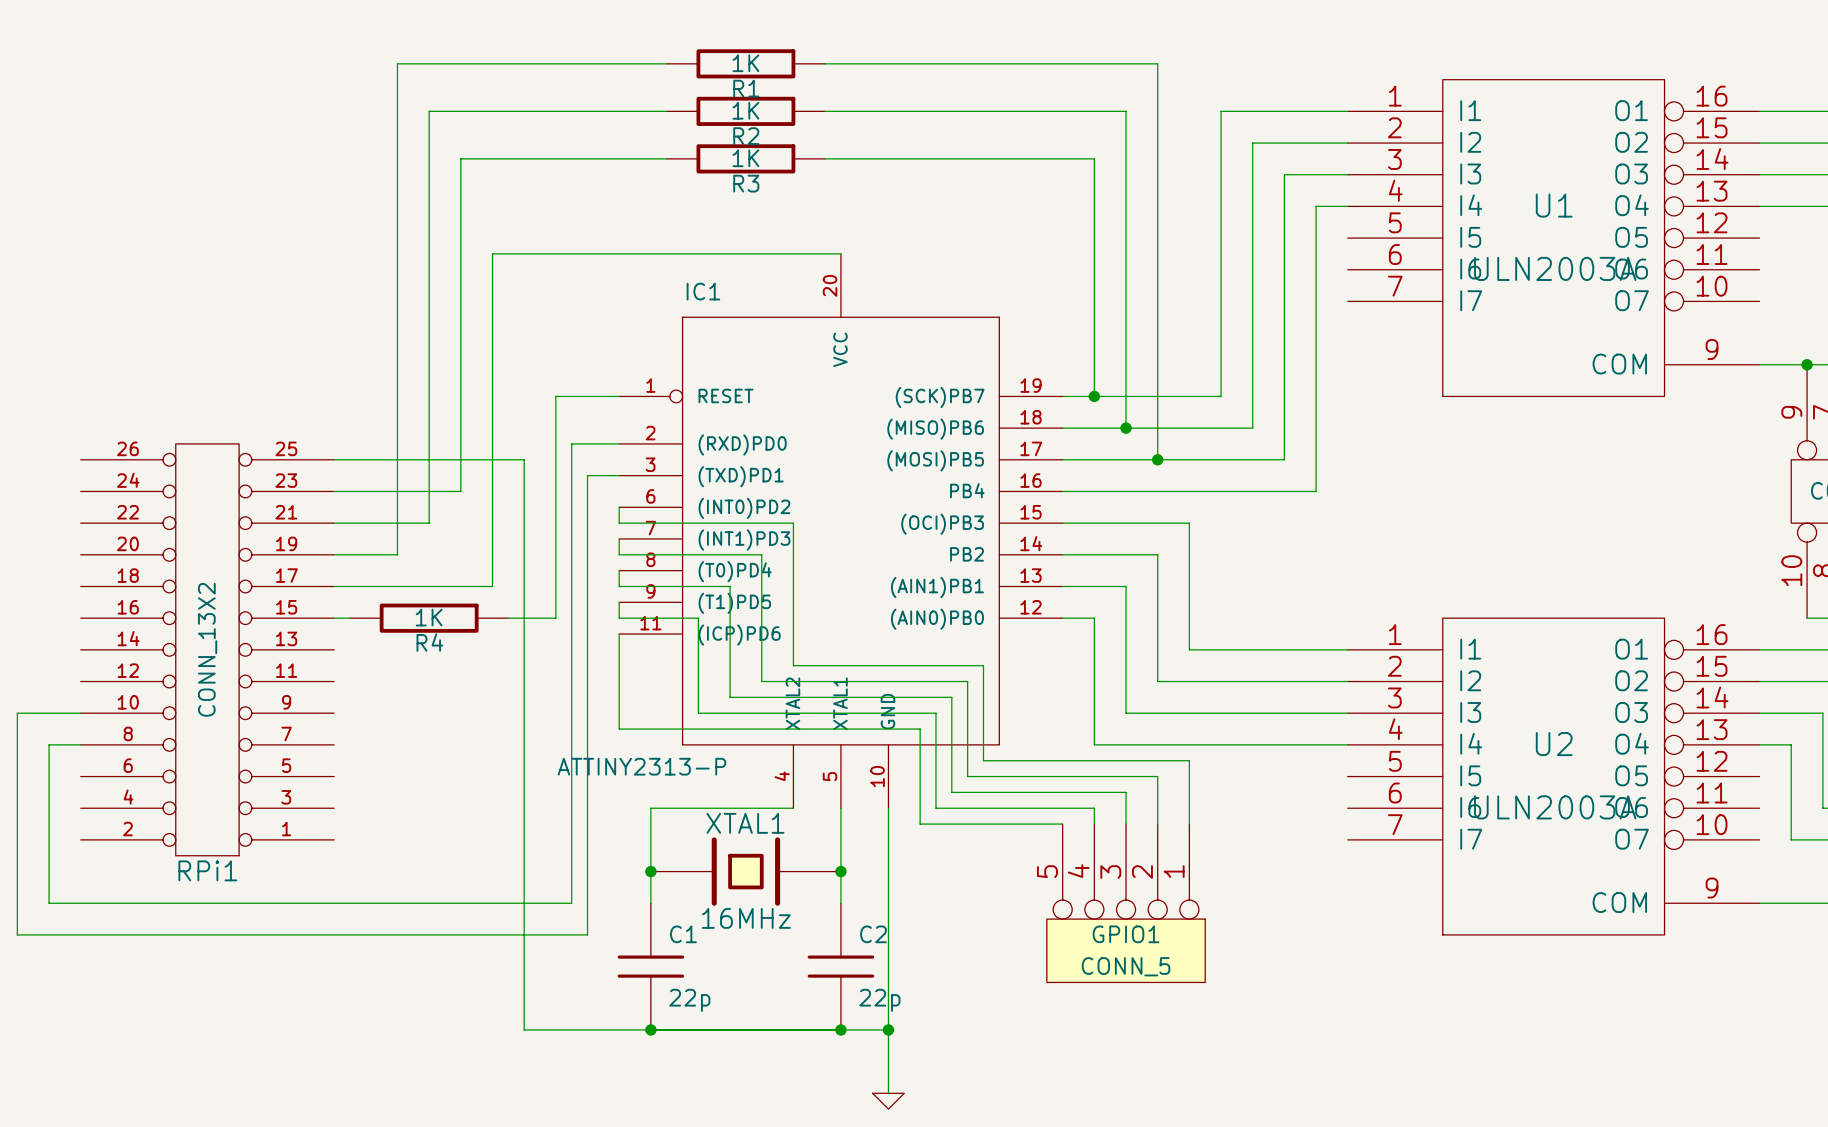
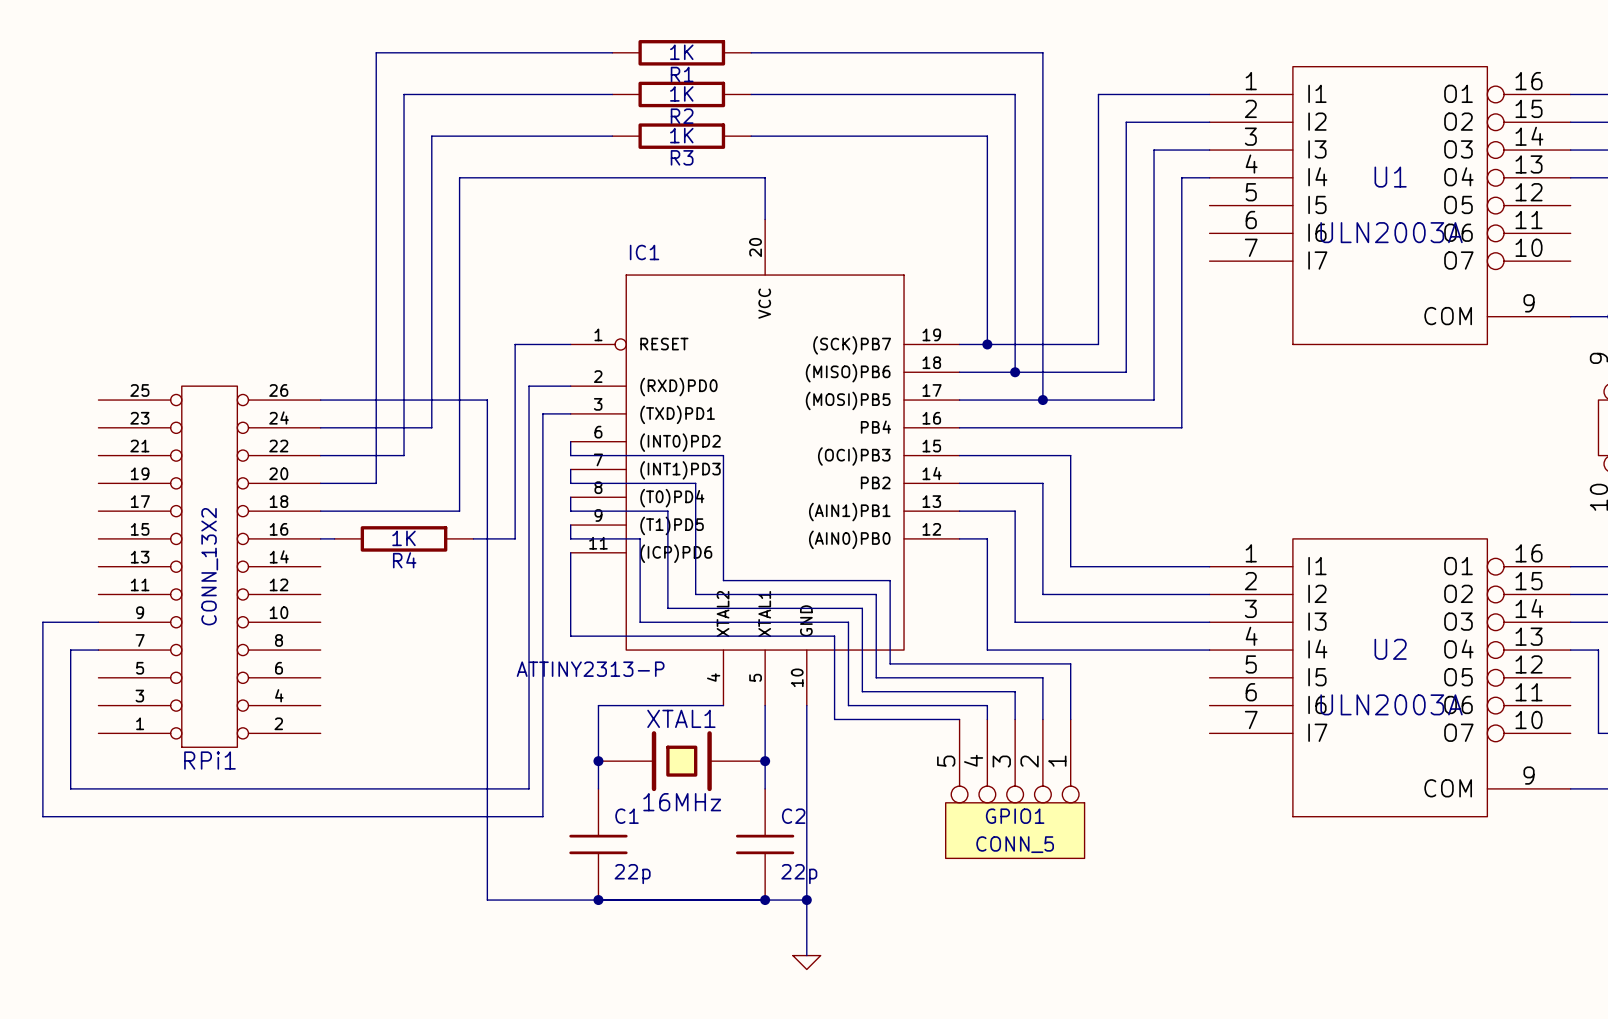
wire: (492, 253) (840, 253) -> (459, 219) (459, 177) (765, 177) (765, 219)
RPi1 flip: as is (207, 649) -> left-right (209, 566)

